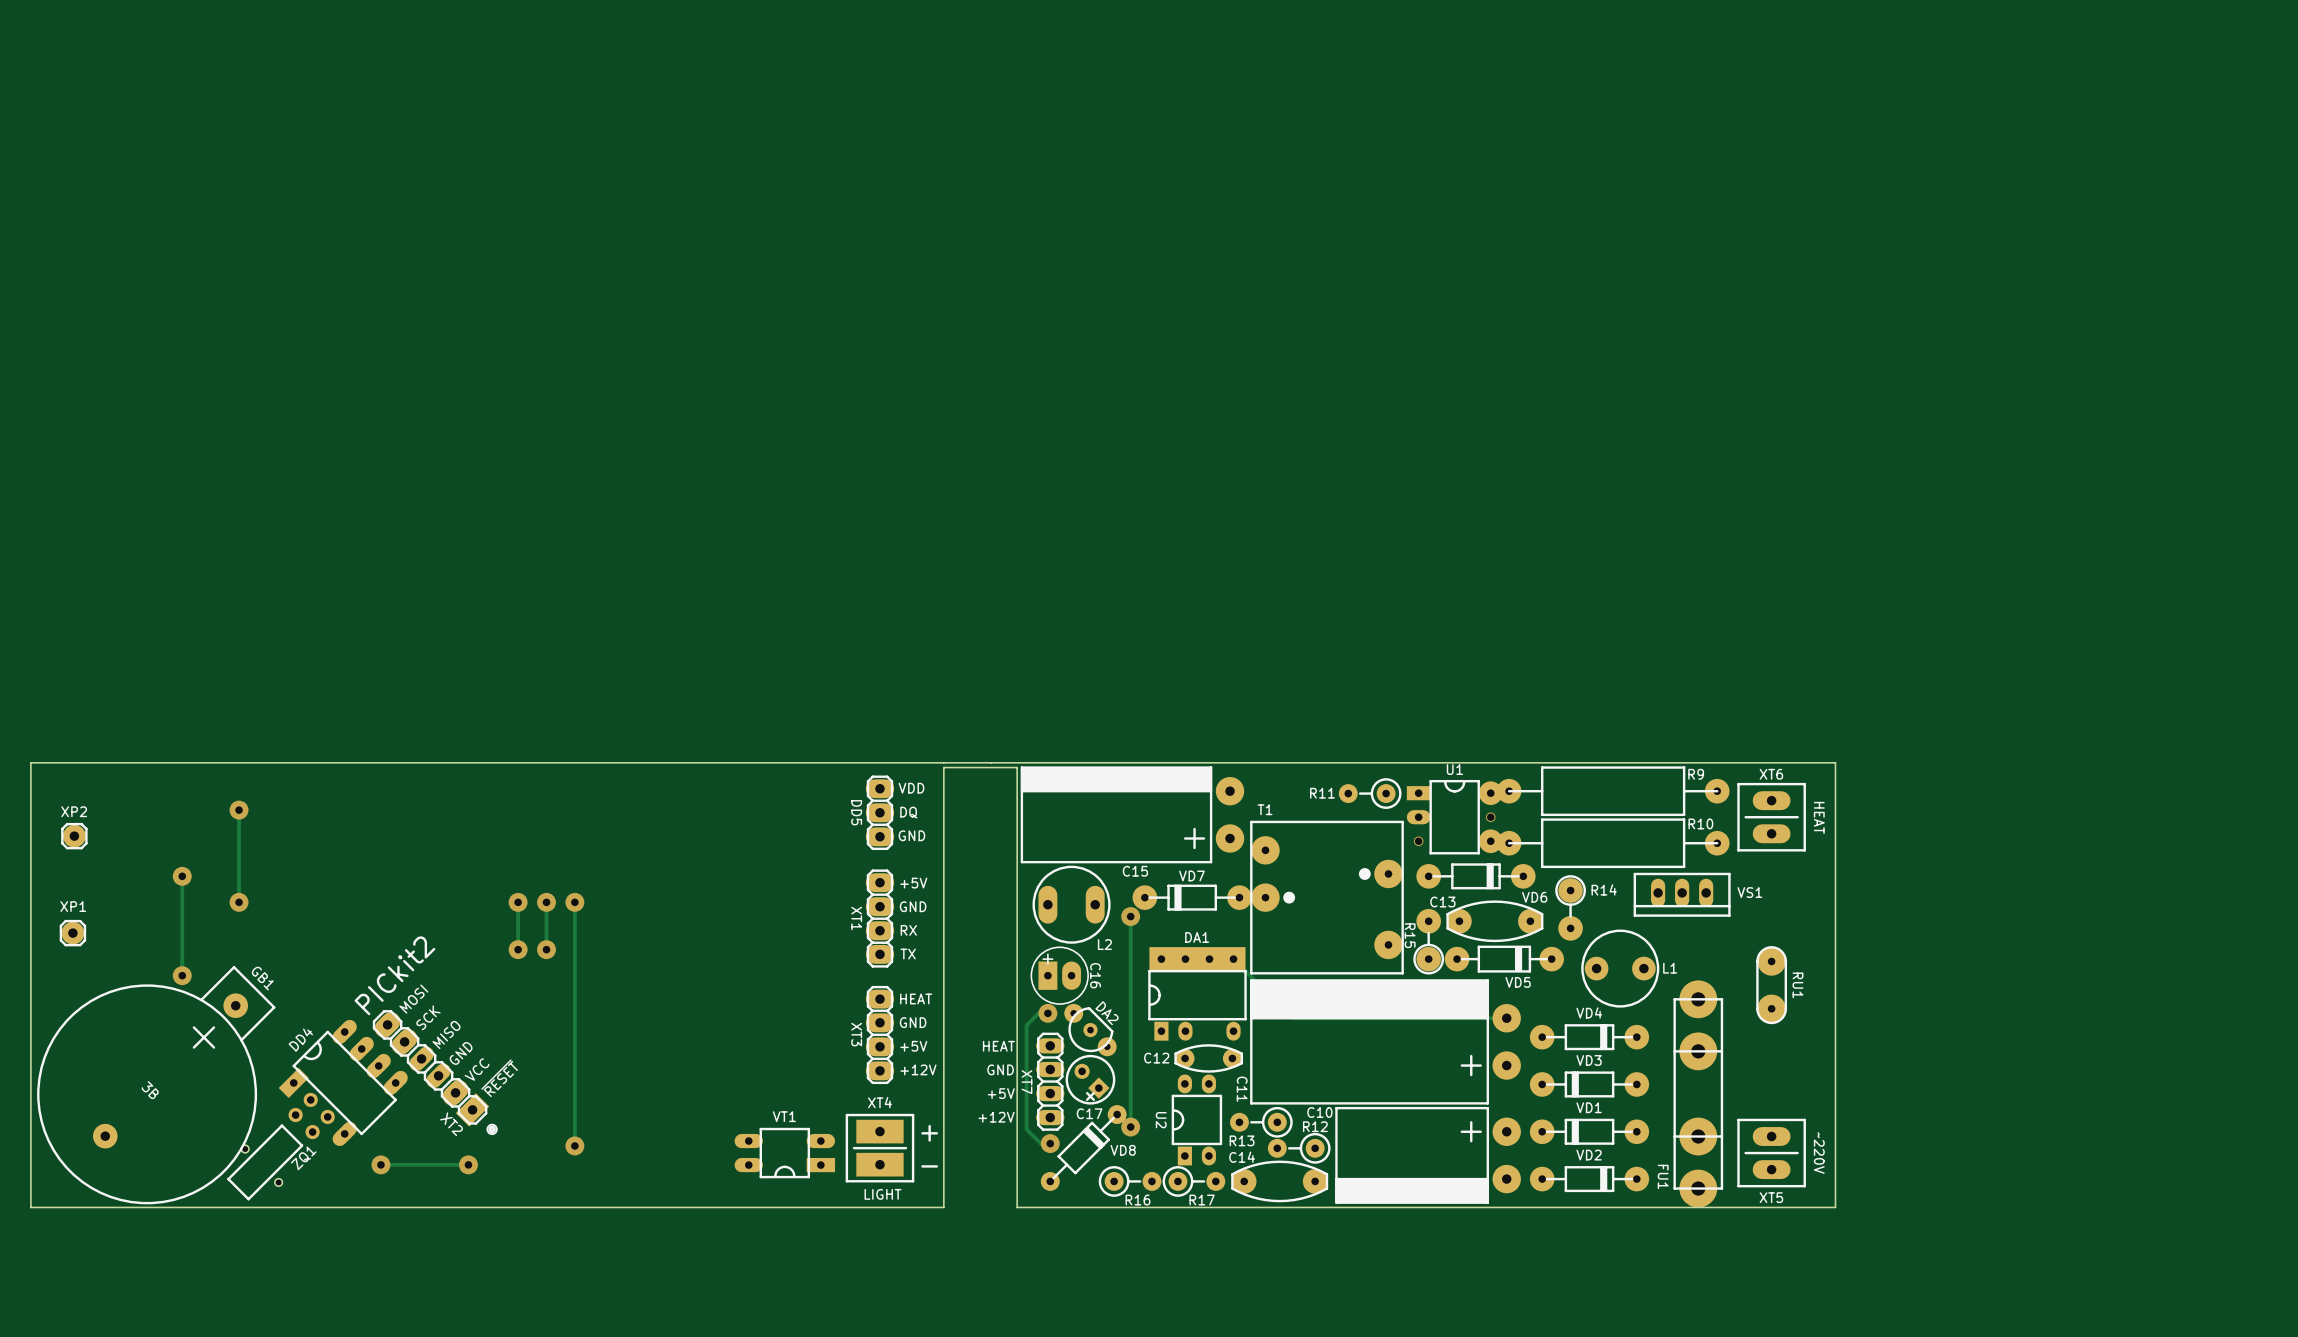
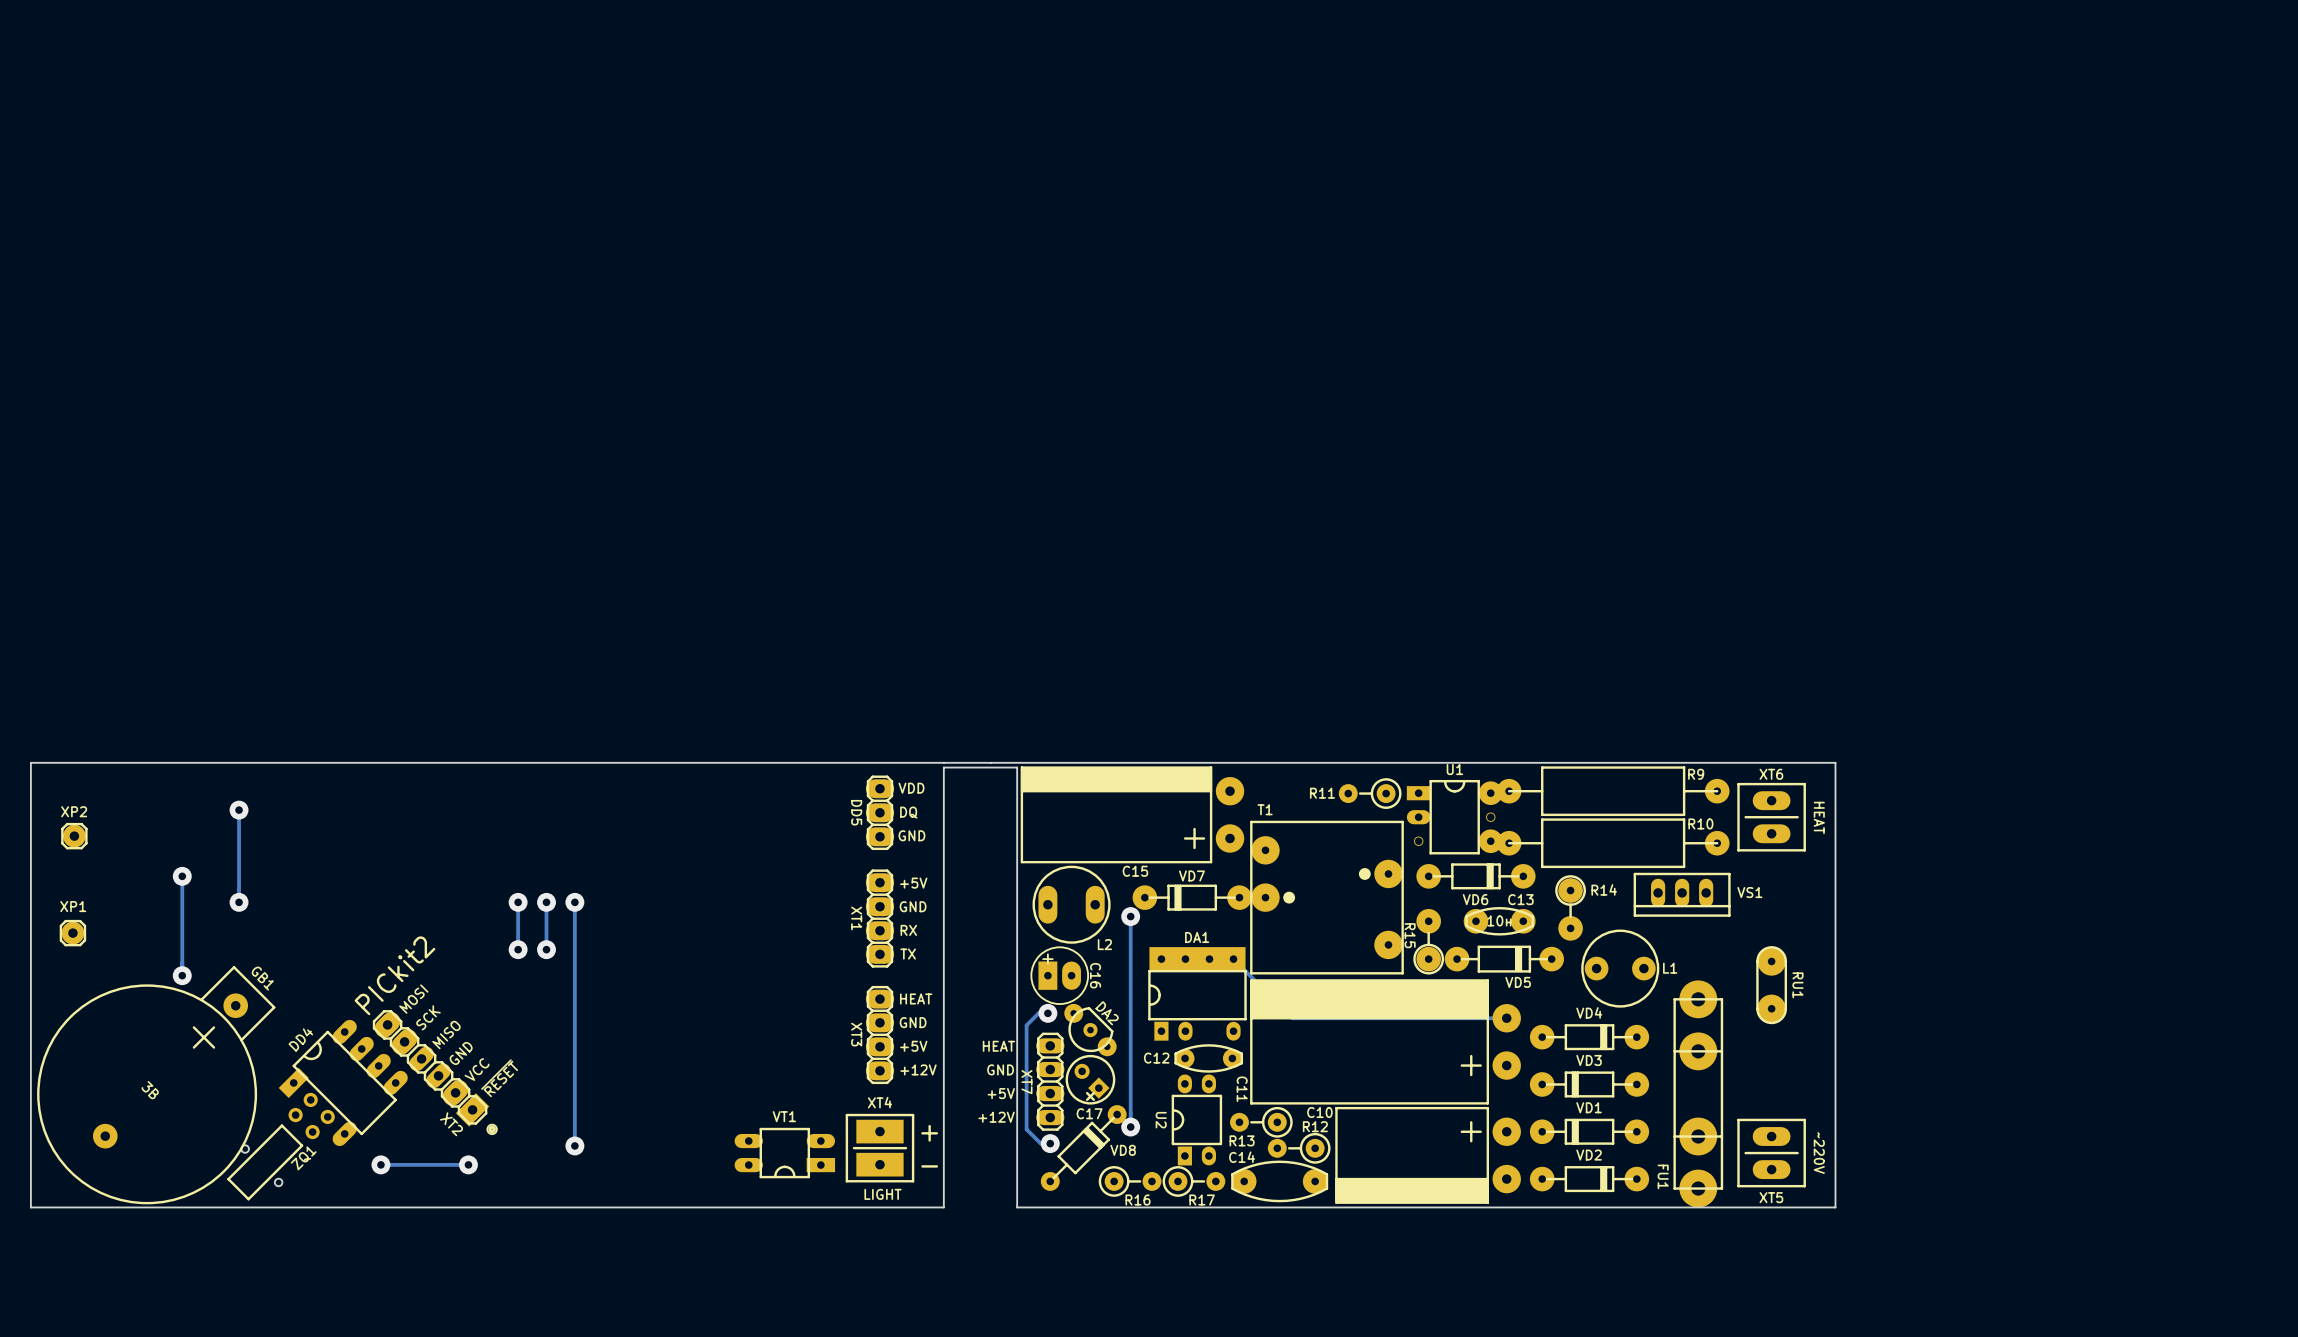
VD6 name position: VD6 (1534, 897) -> VD6 (1475, 899)
C13 footprint: [1446, 900, 1544, 943] -> [1463, 907, 1536, 936]
C13 name position: C13 (1442, 902) -> C13 (1520, 899)
C13 value: none -> 10н (1499, 920)

